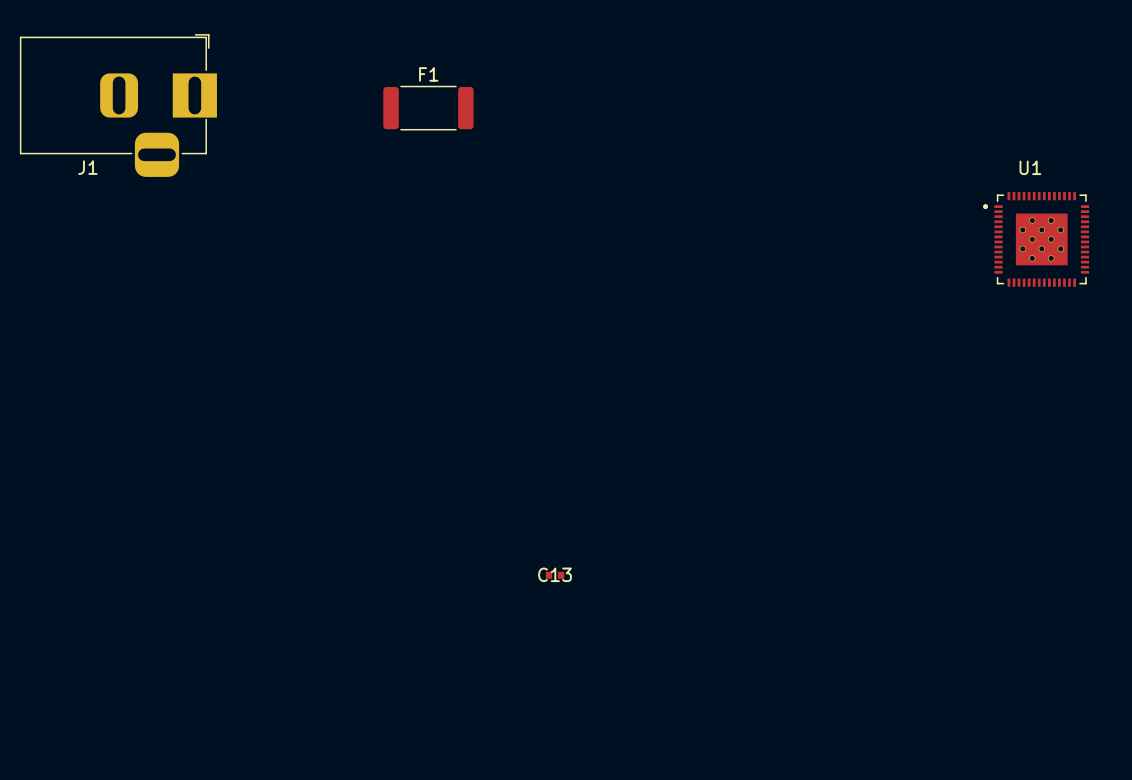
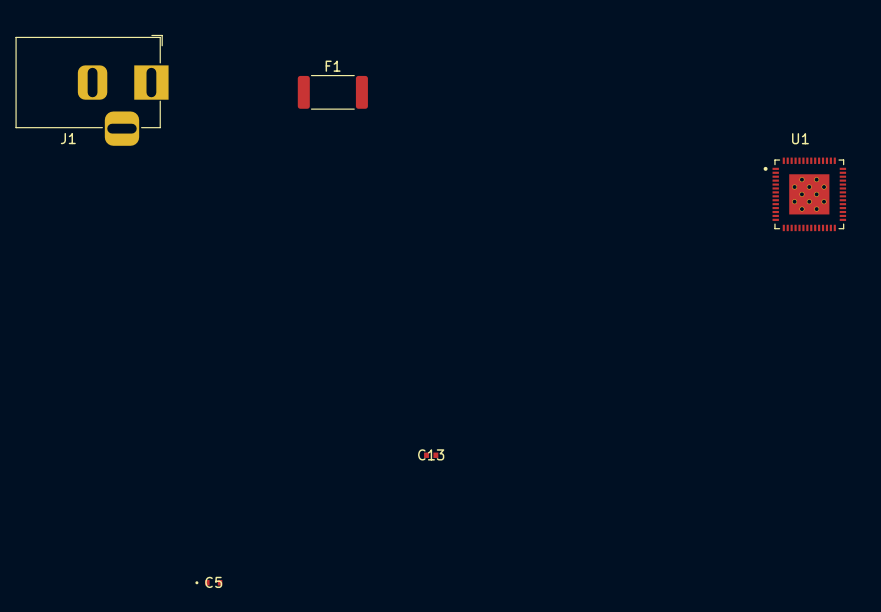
C5: none -> (208, 582)

